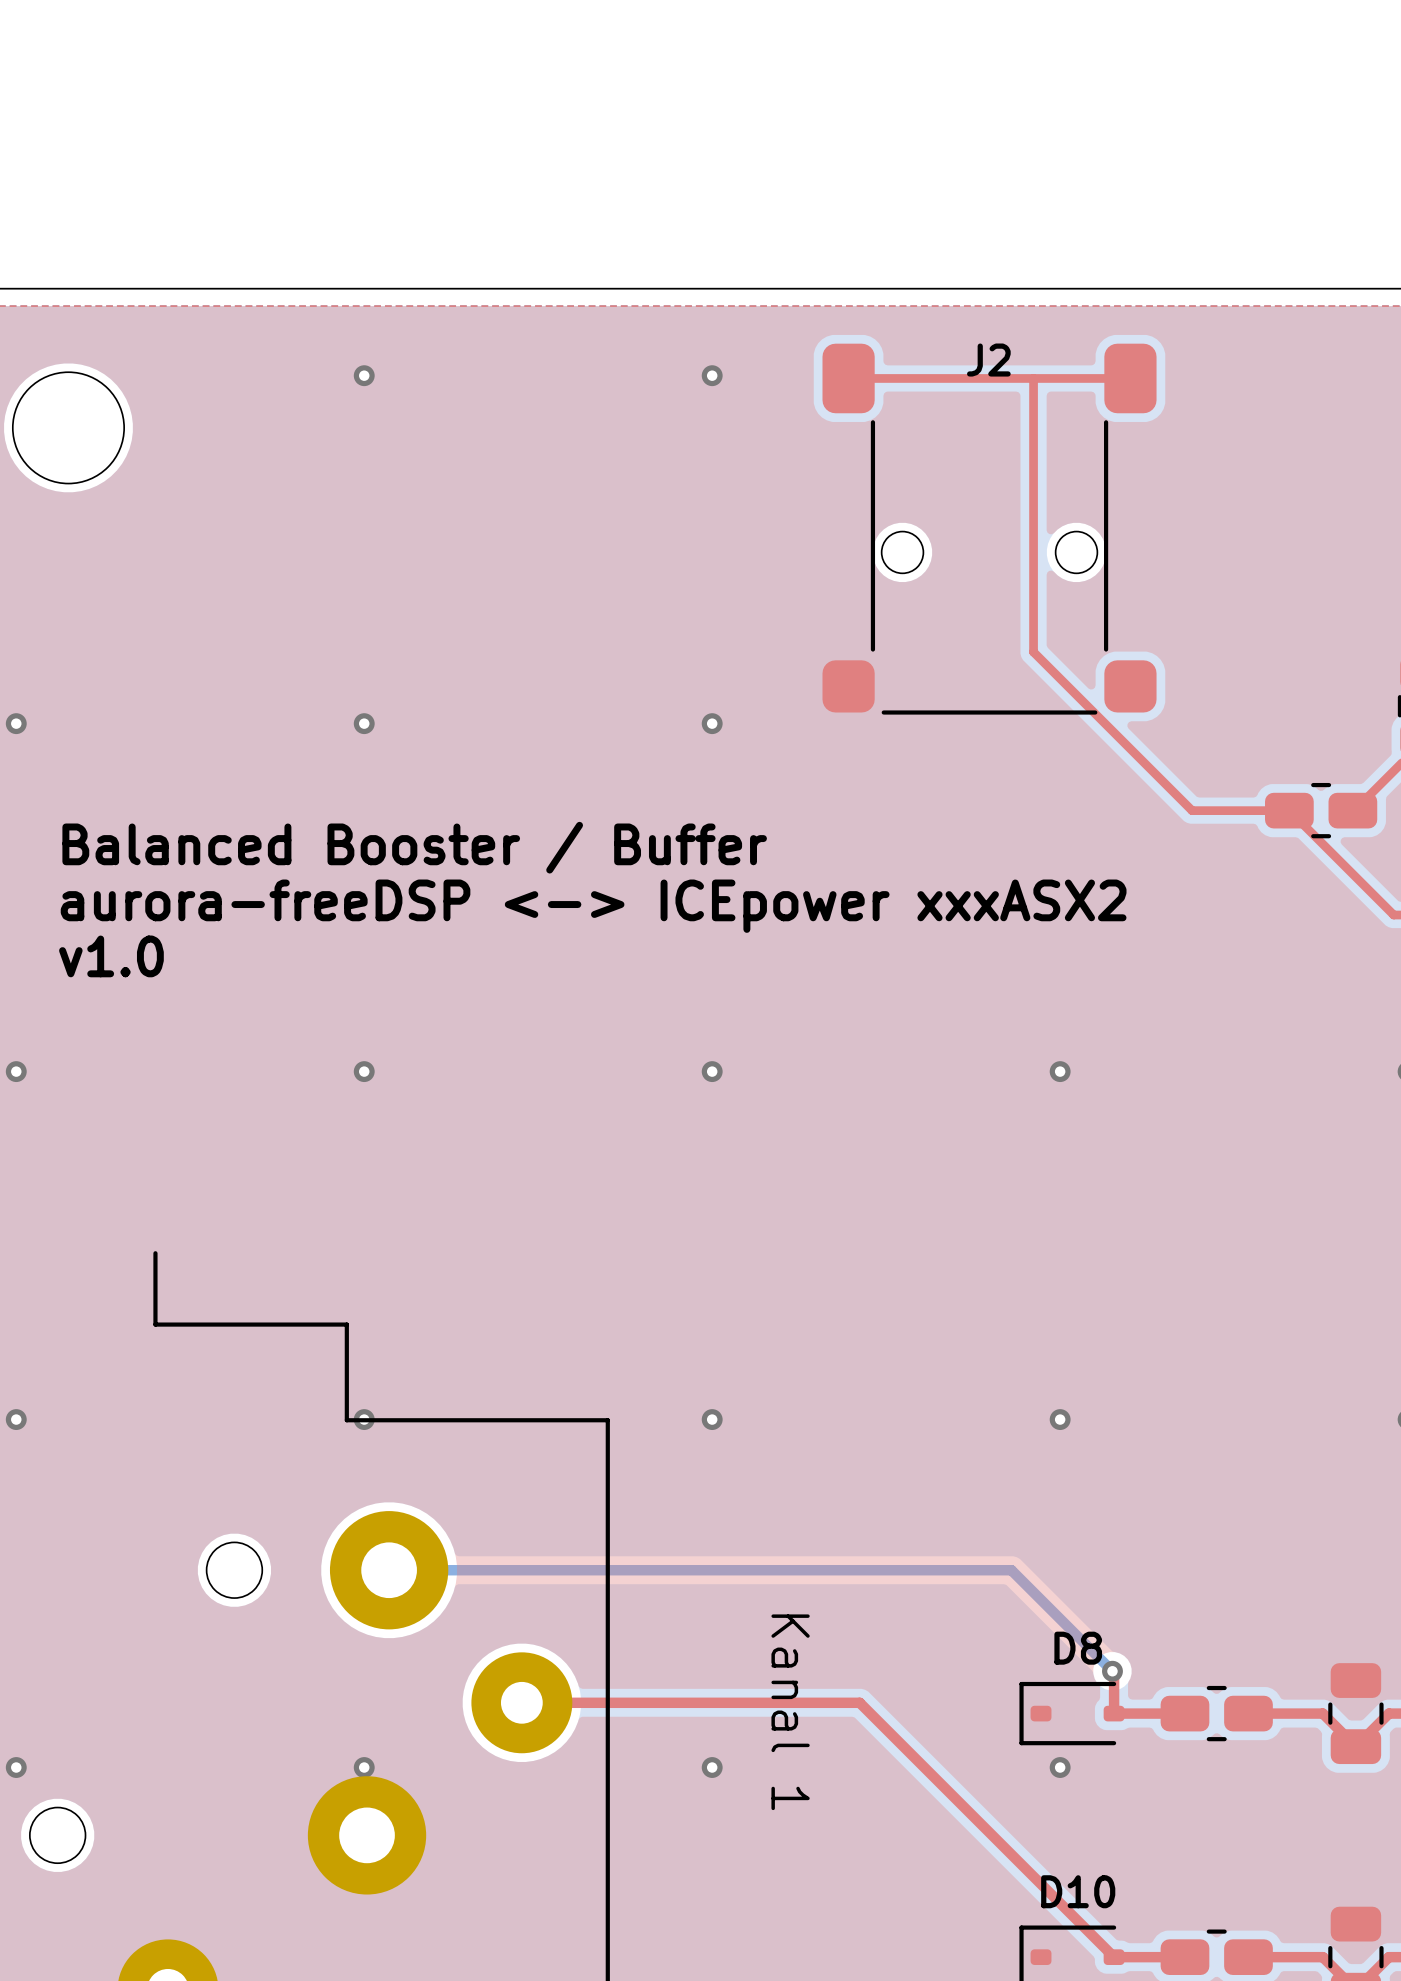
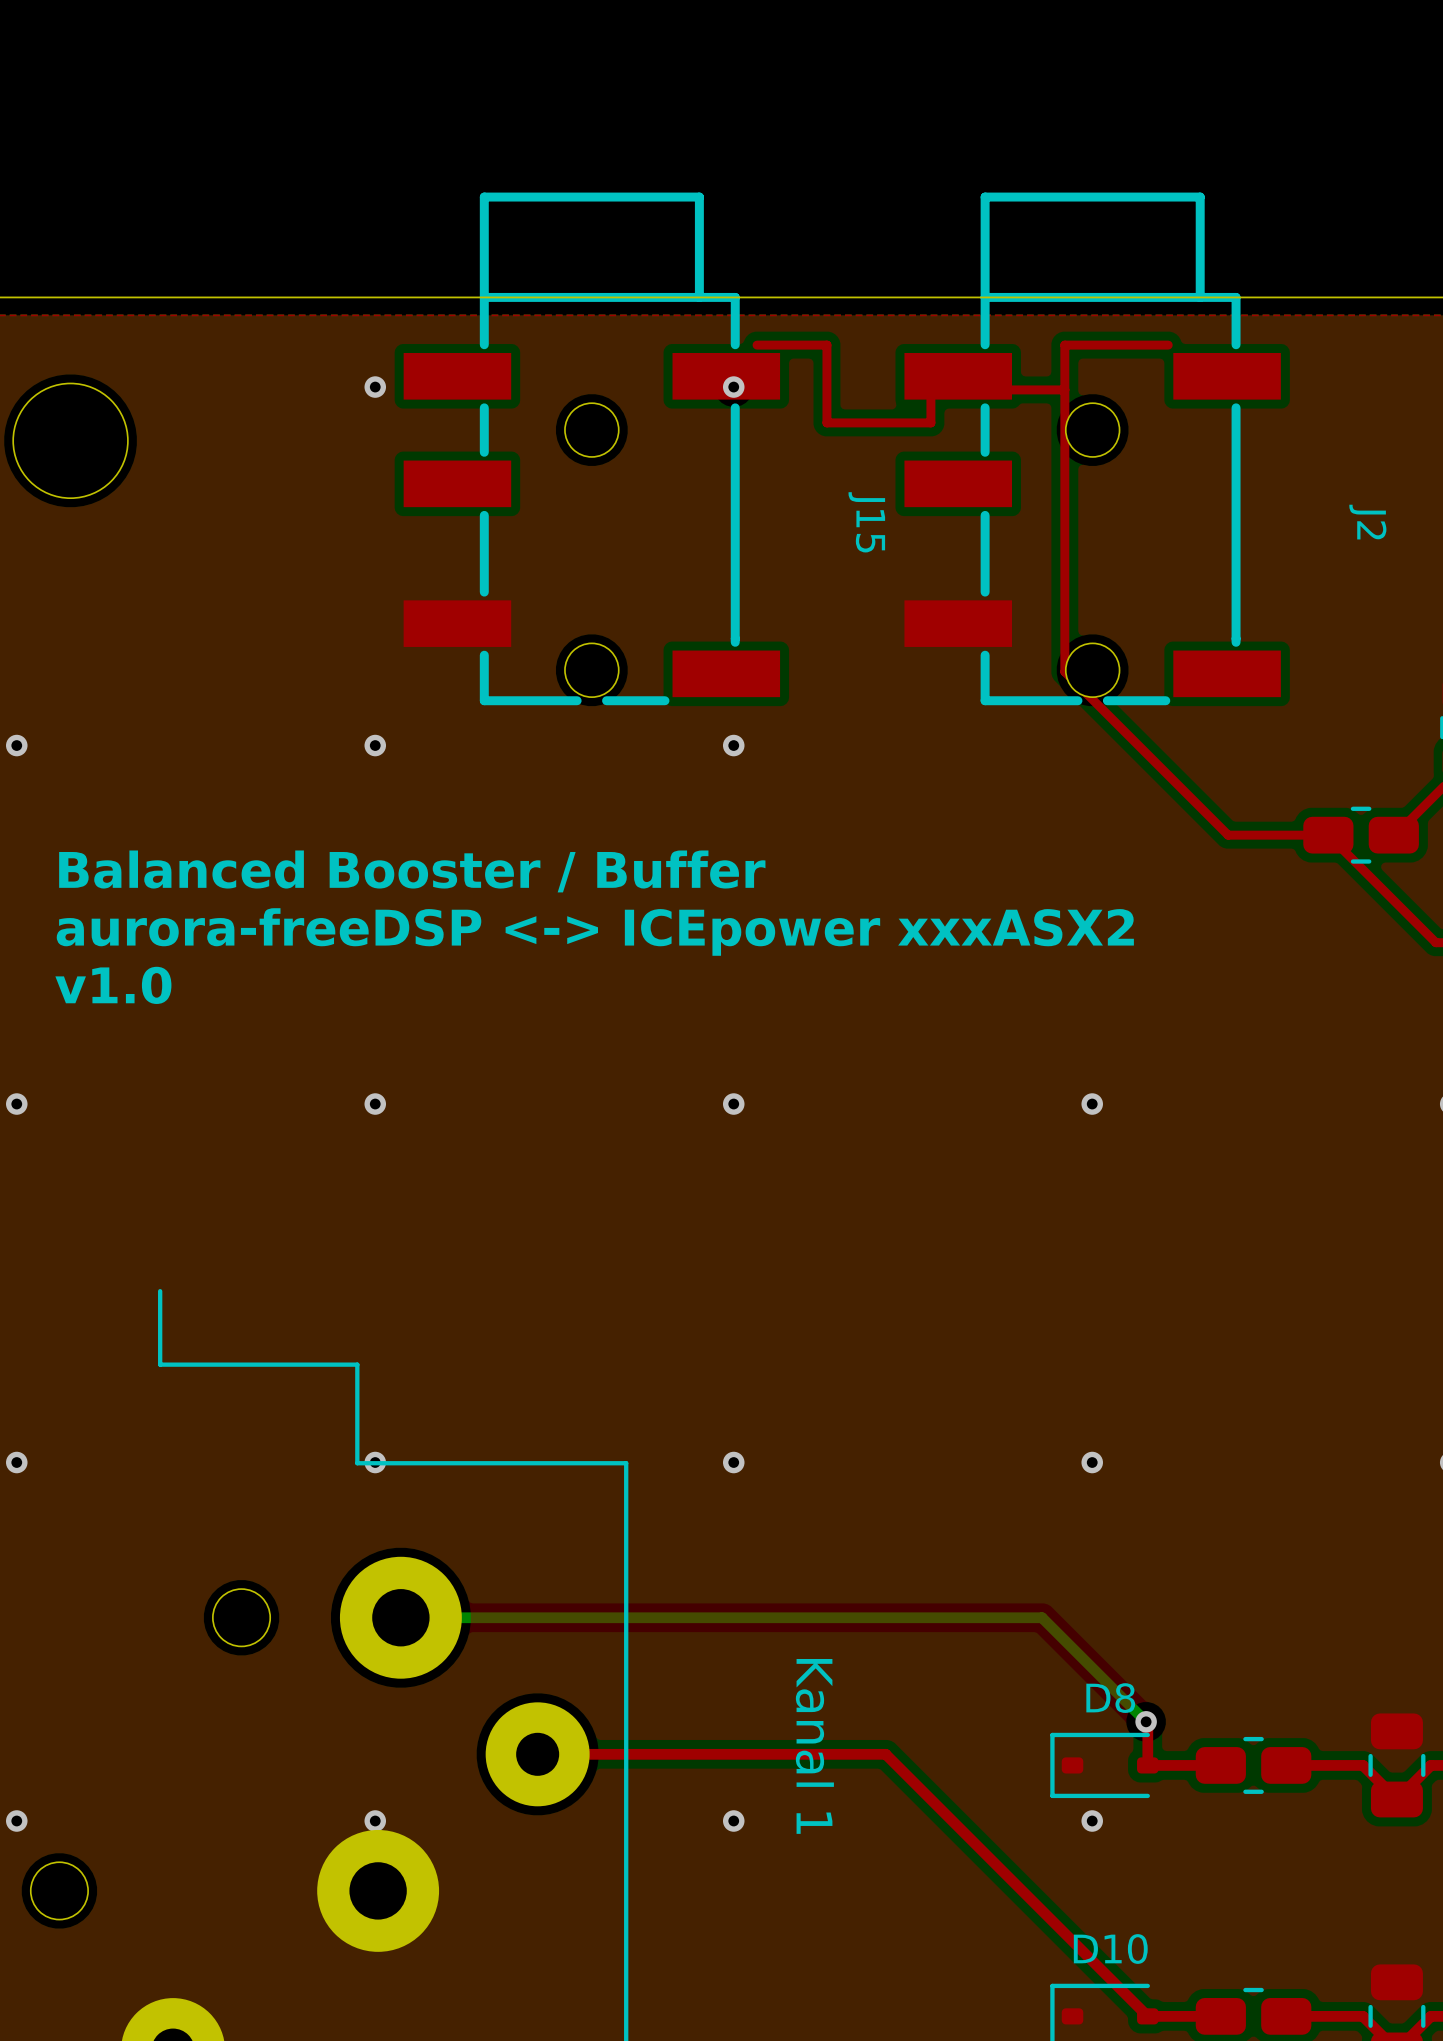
J2 footprint: [822, 343, 1157, 715] -> [904, 192, 1281, 706]
J2 name position: J2 (988, 360) -> J2 (1367, 522)
top track: (848, 378) (903, 378) -> (757, 345) (826, 345) (826, 422) (930, 422) (930, 389)
top track: (1033, 378) (1130, 378) -> (1064, 389) (1064, 345) (1168, 345)
J15: none -> (591, 448)

